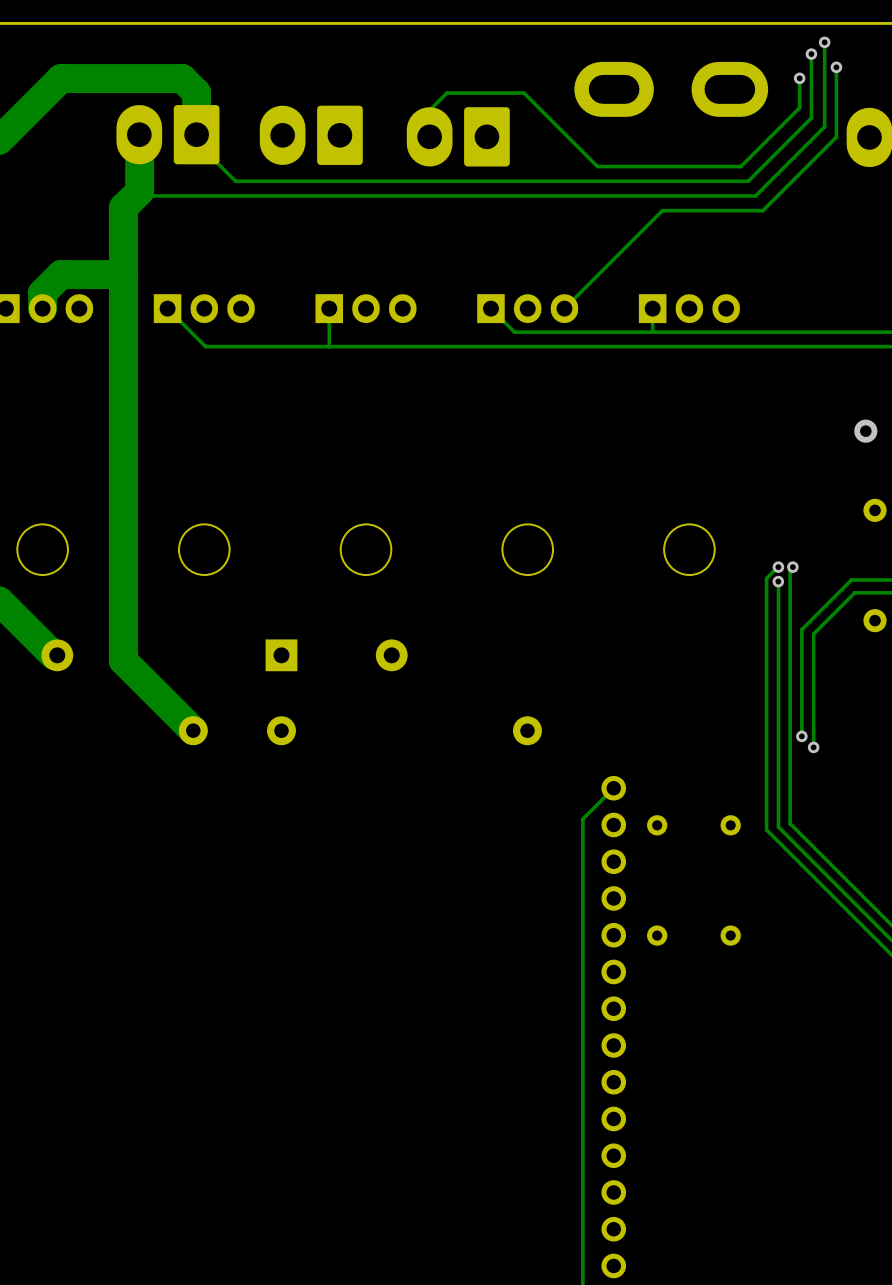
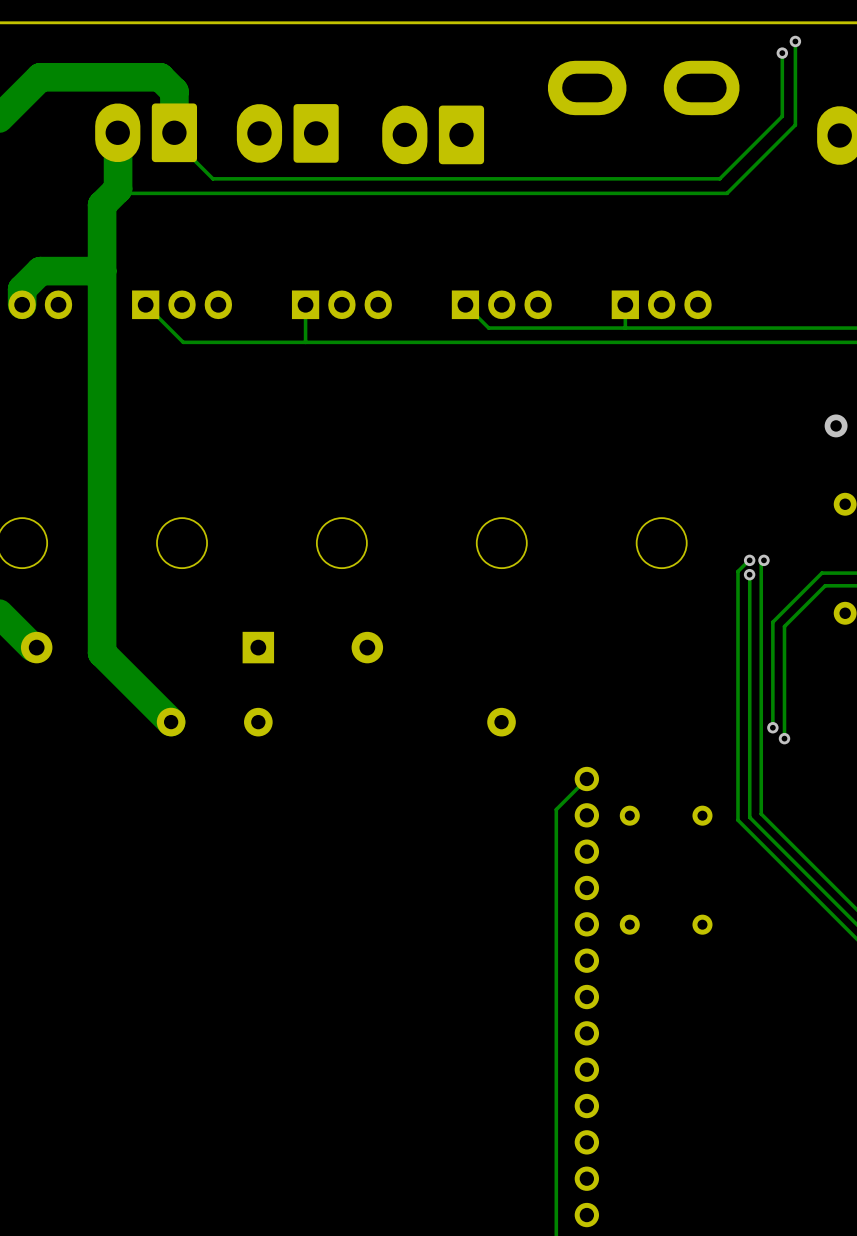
track: (836, 67) (836, 137) (762, 210) (662, 210) (564, 308) -> none
via: (836, 67) -> none
track: (799, 78) (799, 107) (740, 166) (597, 166) (524, 93) (446, 93) (429, 110) (429, 136) -> none
via: (799, 78) -> none

